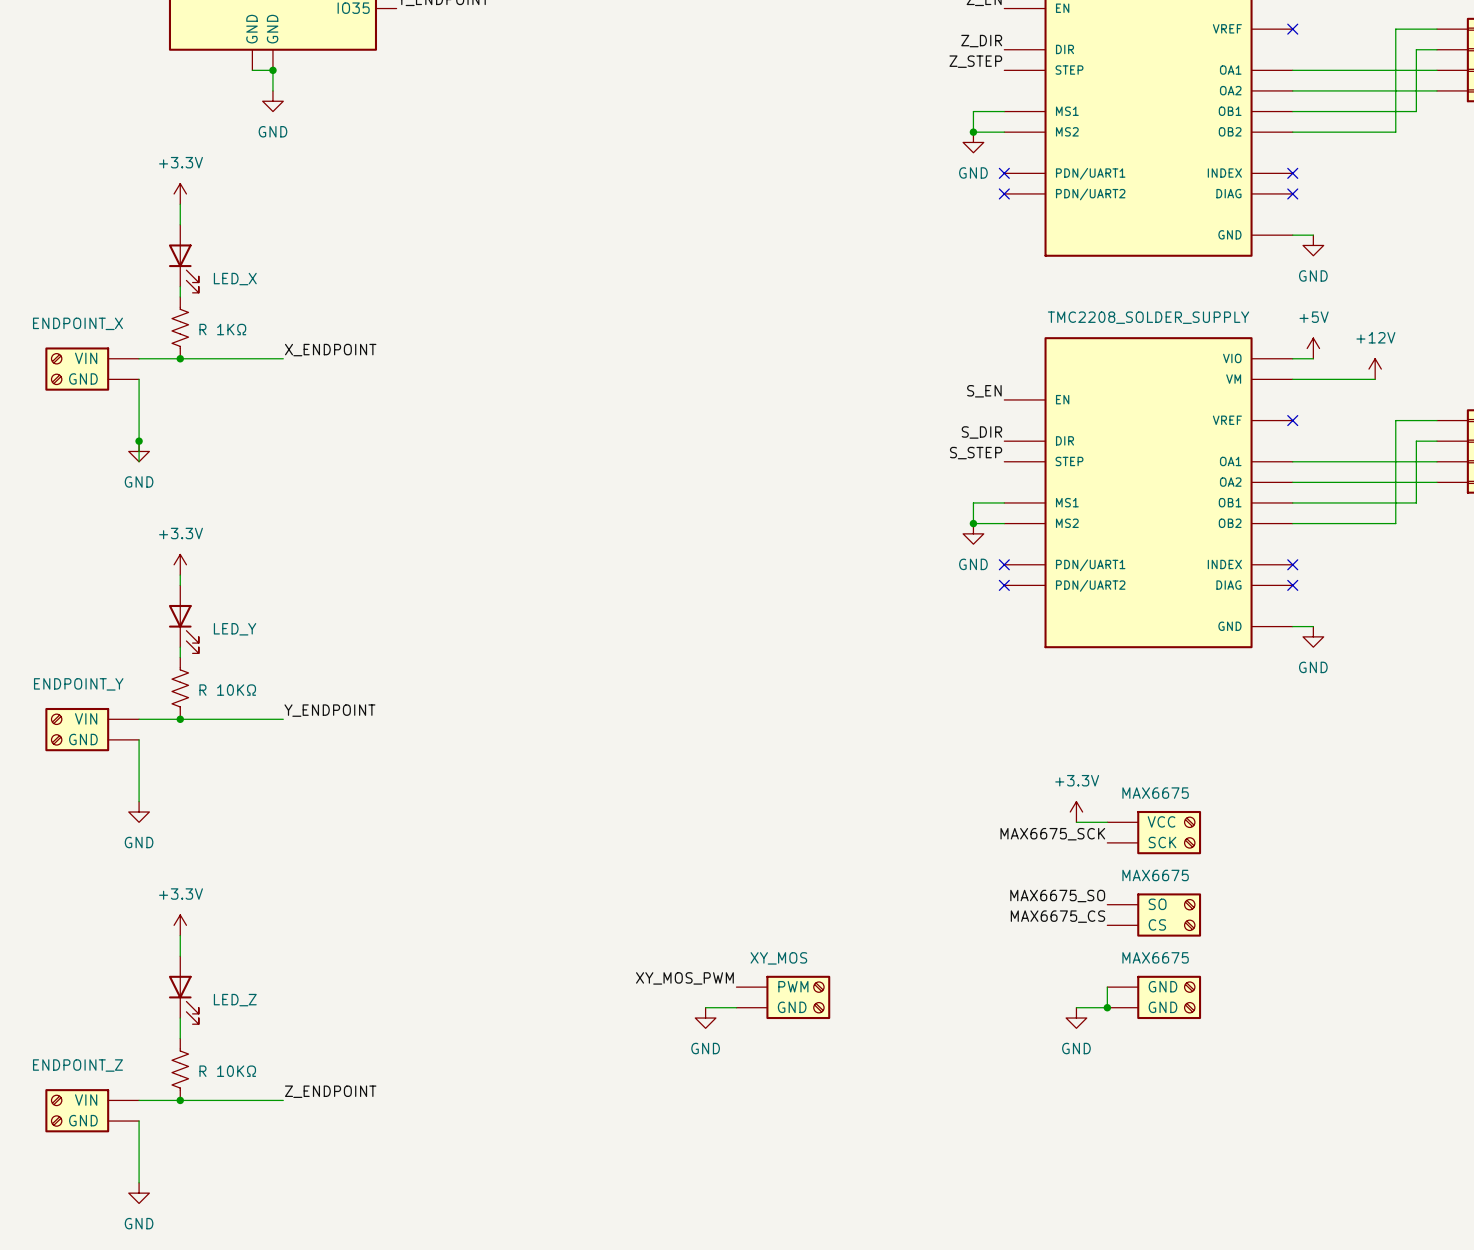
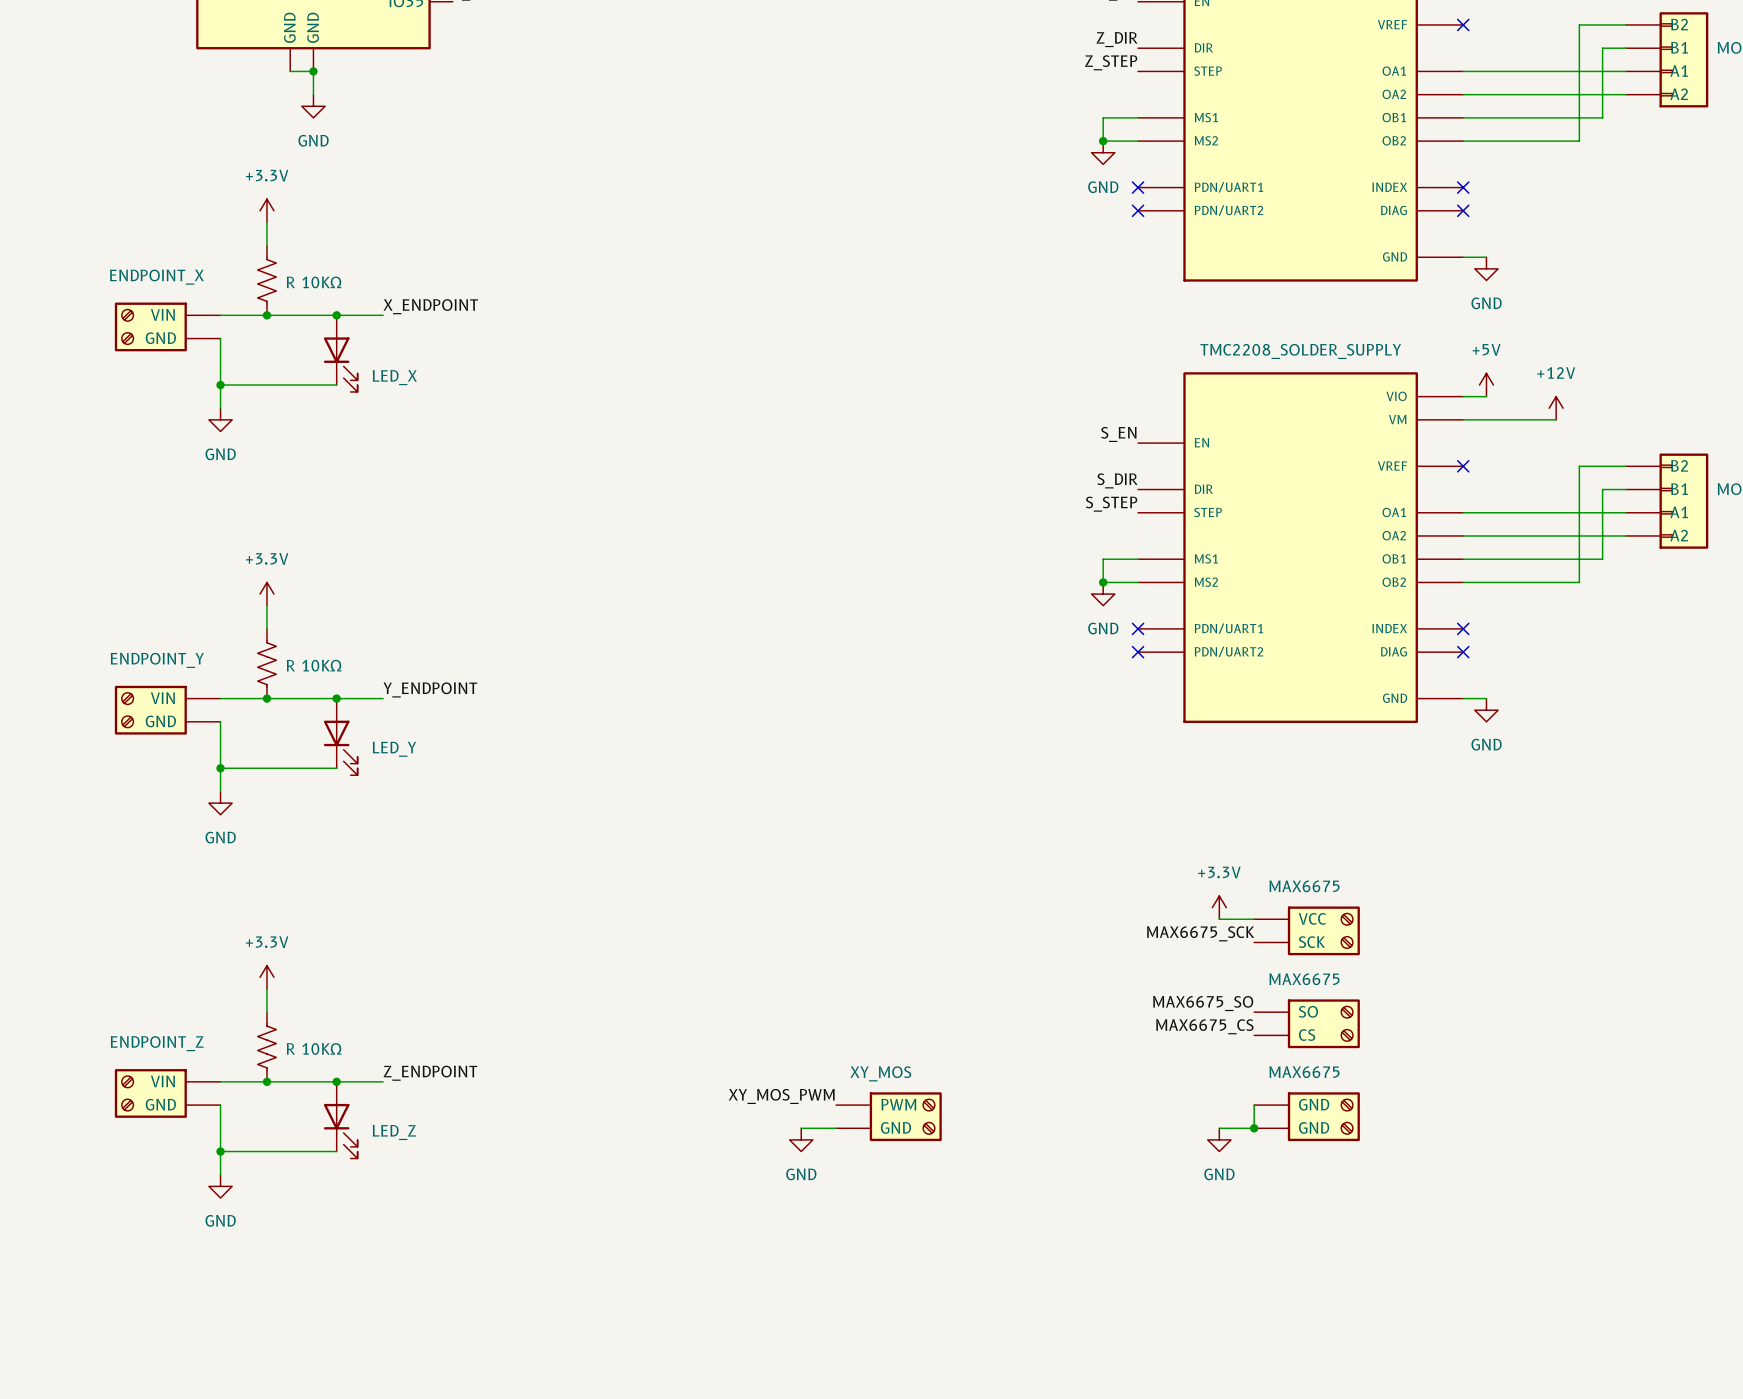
power symbol position: +3.3V (180, 193) -> +3.3V (266, 210)
wire: (180, 204) (180, 224) -> (266, 222) (266, 245)
part: none -> R 10KΩ (266, 280)
part position: (183, 258) -> (340, 353)
wire: (180, 286) (180, 296) -> none
junction: none -> (266, 315)
junction: none -> (336, 315)
wire: none -> (220, 338) (220, 408)
part: R 1KΩ (180, 327) -> none
wire: none -> (220, 385) (336, 385)
label position: X_ENDPOINT (330, 350) -> X_ENDPOINT (430, 306)
wire: (139, 358) (283, 358) -> (220, 315) (383, 315)
junction position: (180, 358) -> (220, 385)
part position: (92, 369) -> (167, 326)
wire: (139, 379) (139, 461) -> none
junction: (139, 441) -> none
power symbol position: GND (139, 451) -> GND (220, 419)
wire: none -> (266, 605) (266, 628)
power symbol position: +3.3V (180, 564) -> +3.3V (266, 594)
wire: (180, 575) (180, 585) -> none
part position: (183, 619) -> (340, 736)
junction: none -> (266, 698)
junction: none -> (336, 698)
wire: (180, 647) (180, 657) -> none
part position: (180, 688) -> (266, 663)
wire: none -> (220, 768) (336, 768)
label position: Y_ENDPOINT (329, 710) -> Y_ENDPOINT (430, 689)
wire: (139, 719) (283, 719) -> (220, 698) (383, 698)
junction position: (180, 719) -> (220, 768)
part position: (92, 729) -> (167, 710)
wire: (139, 739) (139, 801) -> (220, 721) (220, 791)
power symbol position: GND (139, 812) -> GND (220, 803)
power symbol position: +3.3V (180, 925) -> +3.3V (266, 977)
wire: (180, 935) (180, 956) -> none
part: none -> R 10KΩ (266, 1047)
junction: none -> (266, 1081)
junction: none -> (336, 1081)
part position: (183, 990) -> (340, 1120)
wire: (180, 1018) (180, 1038) -> (266, 988) (266, 1012)
wire: none -> (220, 1151) (336, 1151)
junction: none -> (220, 1151)
power symbol: none -> GND (220, 1186)
part: R 10KΩ (180, 1069) -> none
label position: Z_ENDPOINT (330, 1091) -> Z_ENDPOINT (430, 1073)
wire: (139, 1100) (283, 1100) -> (220, 1081) (383, 1081)
junction: (180, 1100) -> none
part position: (92, 1110) -> (167, 1093)
wire: (139, 1121) (139, 1182) -> (220, 1105) (220, 1174)
power symbol: GND (139, 1193) -> none

